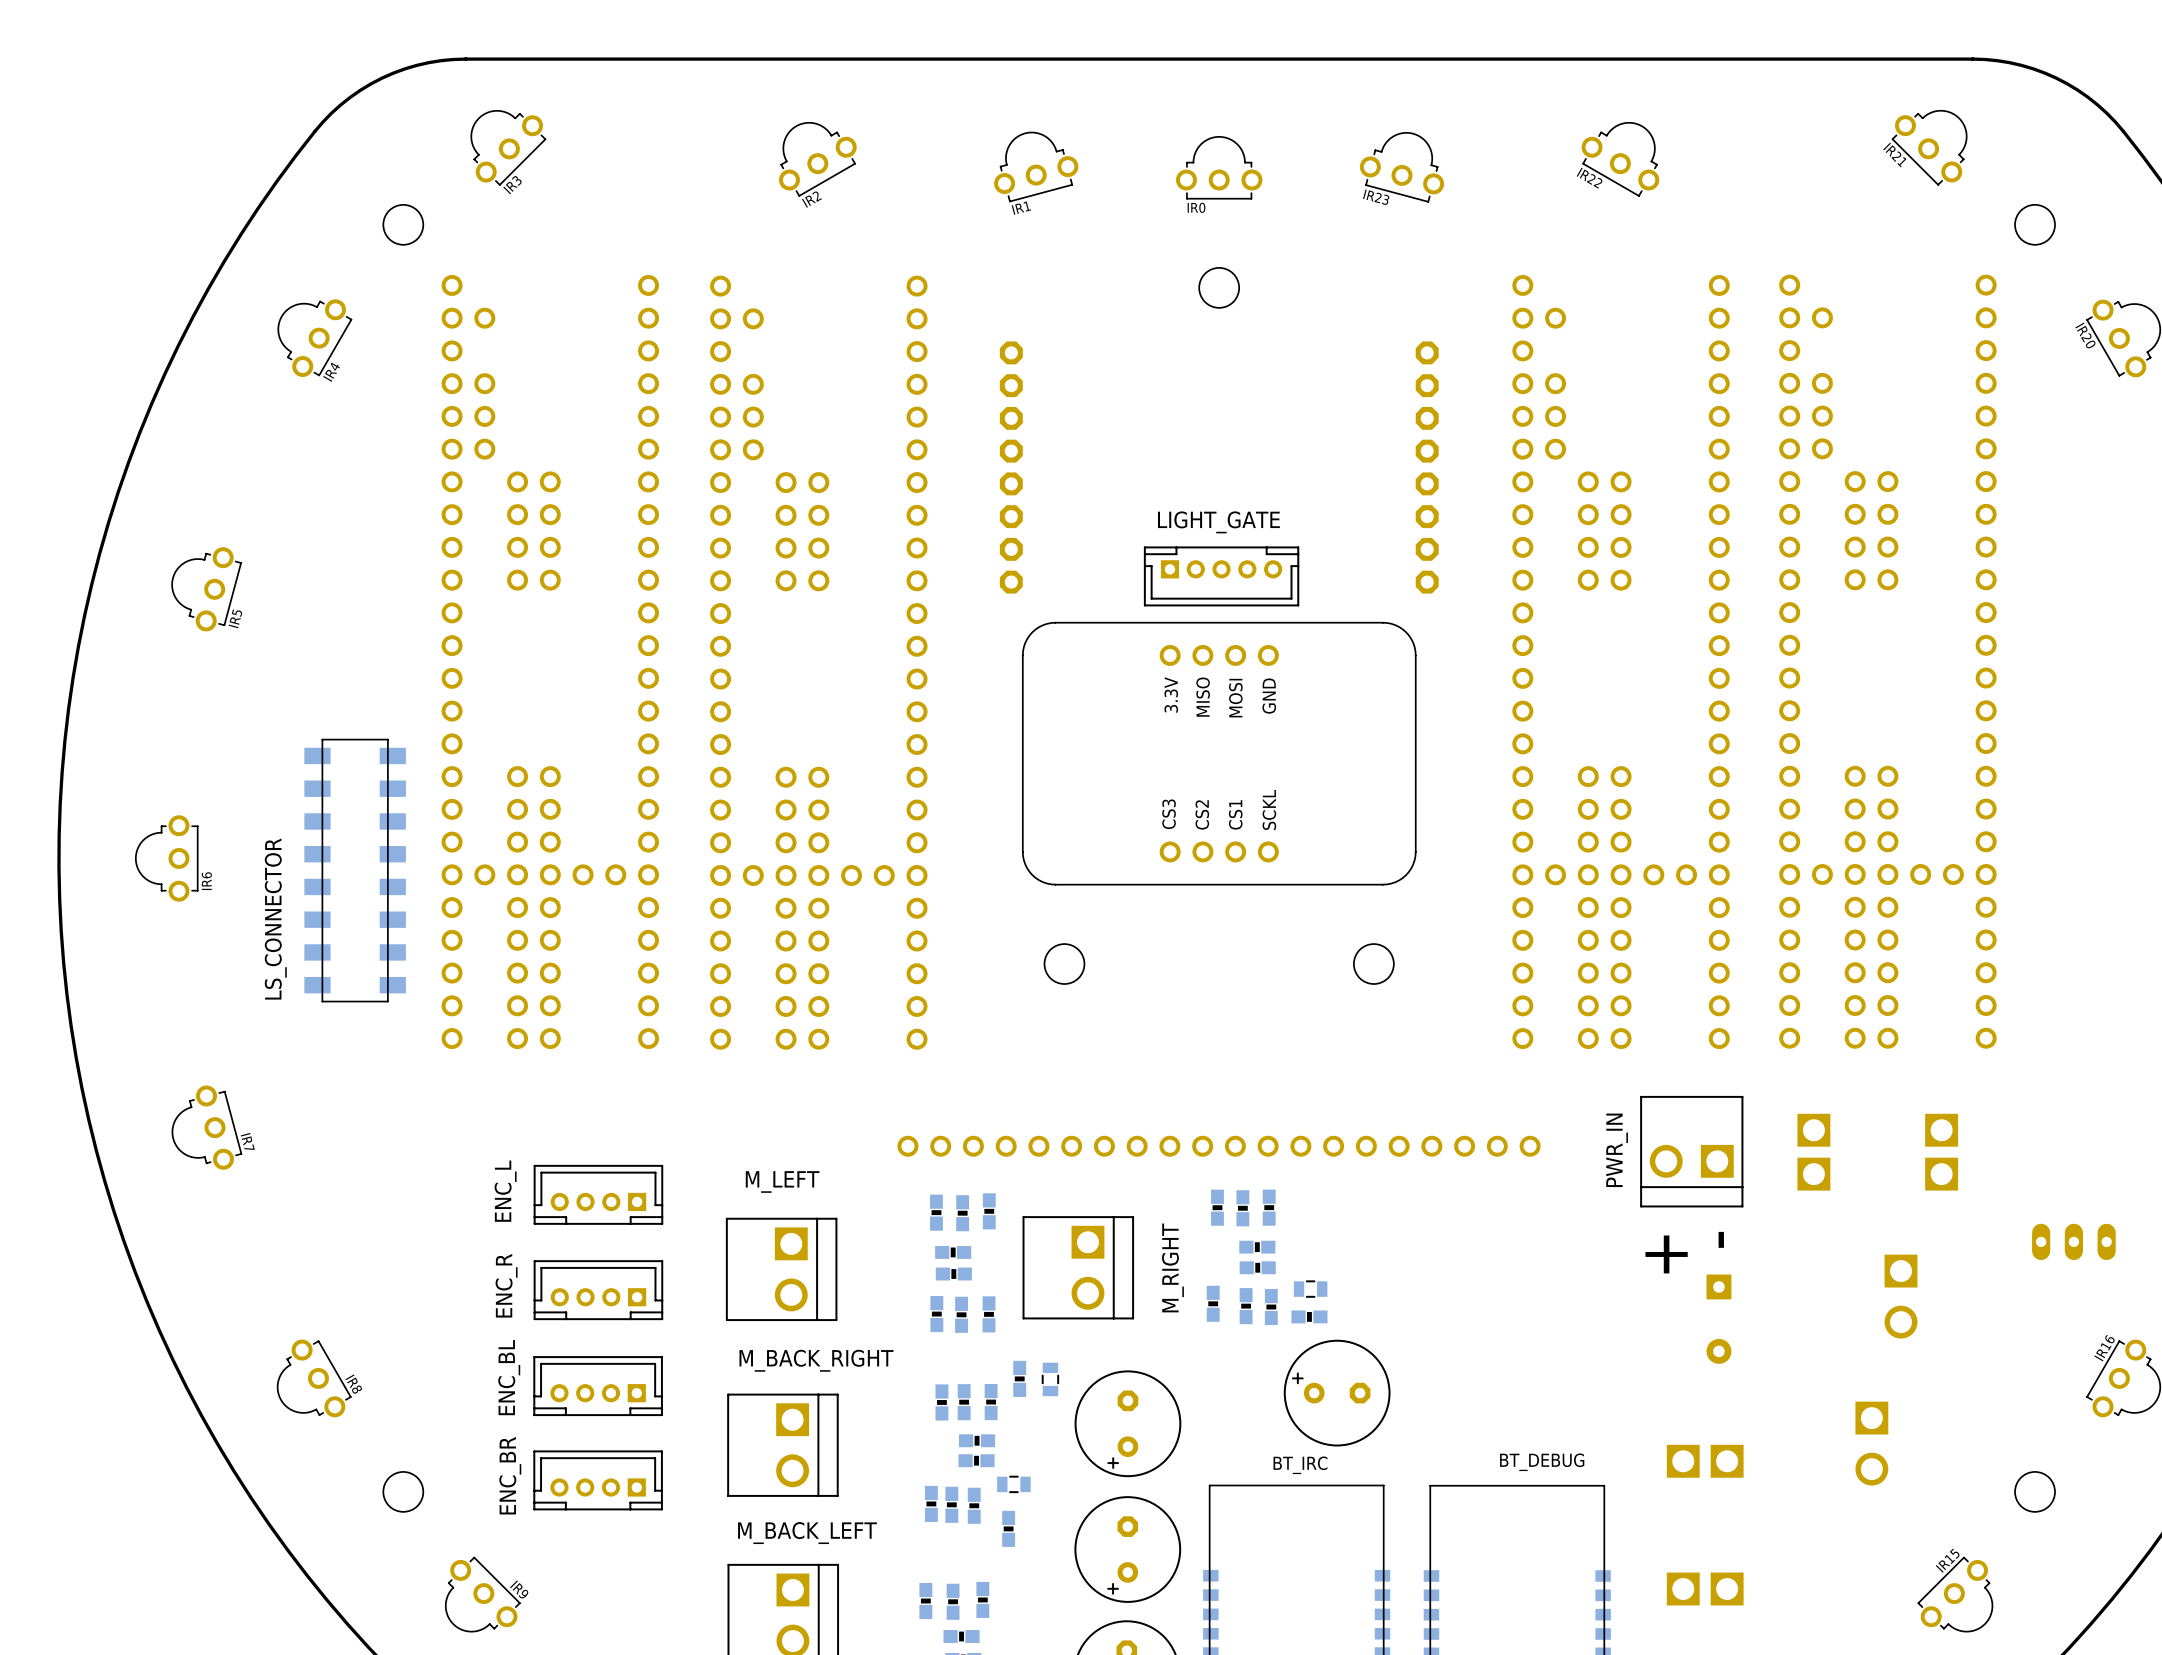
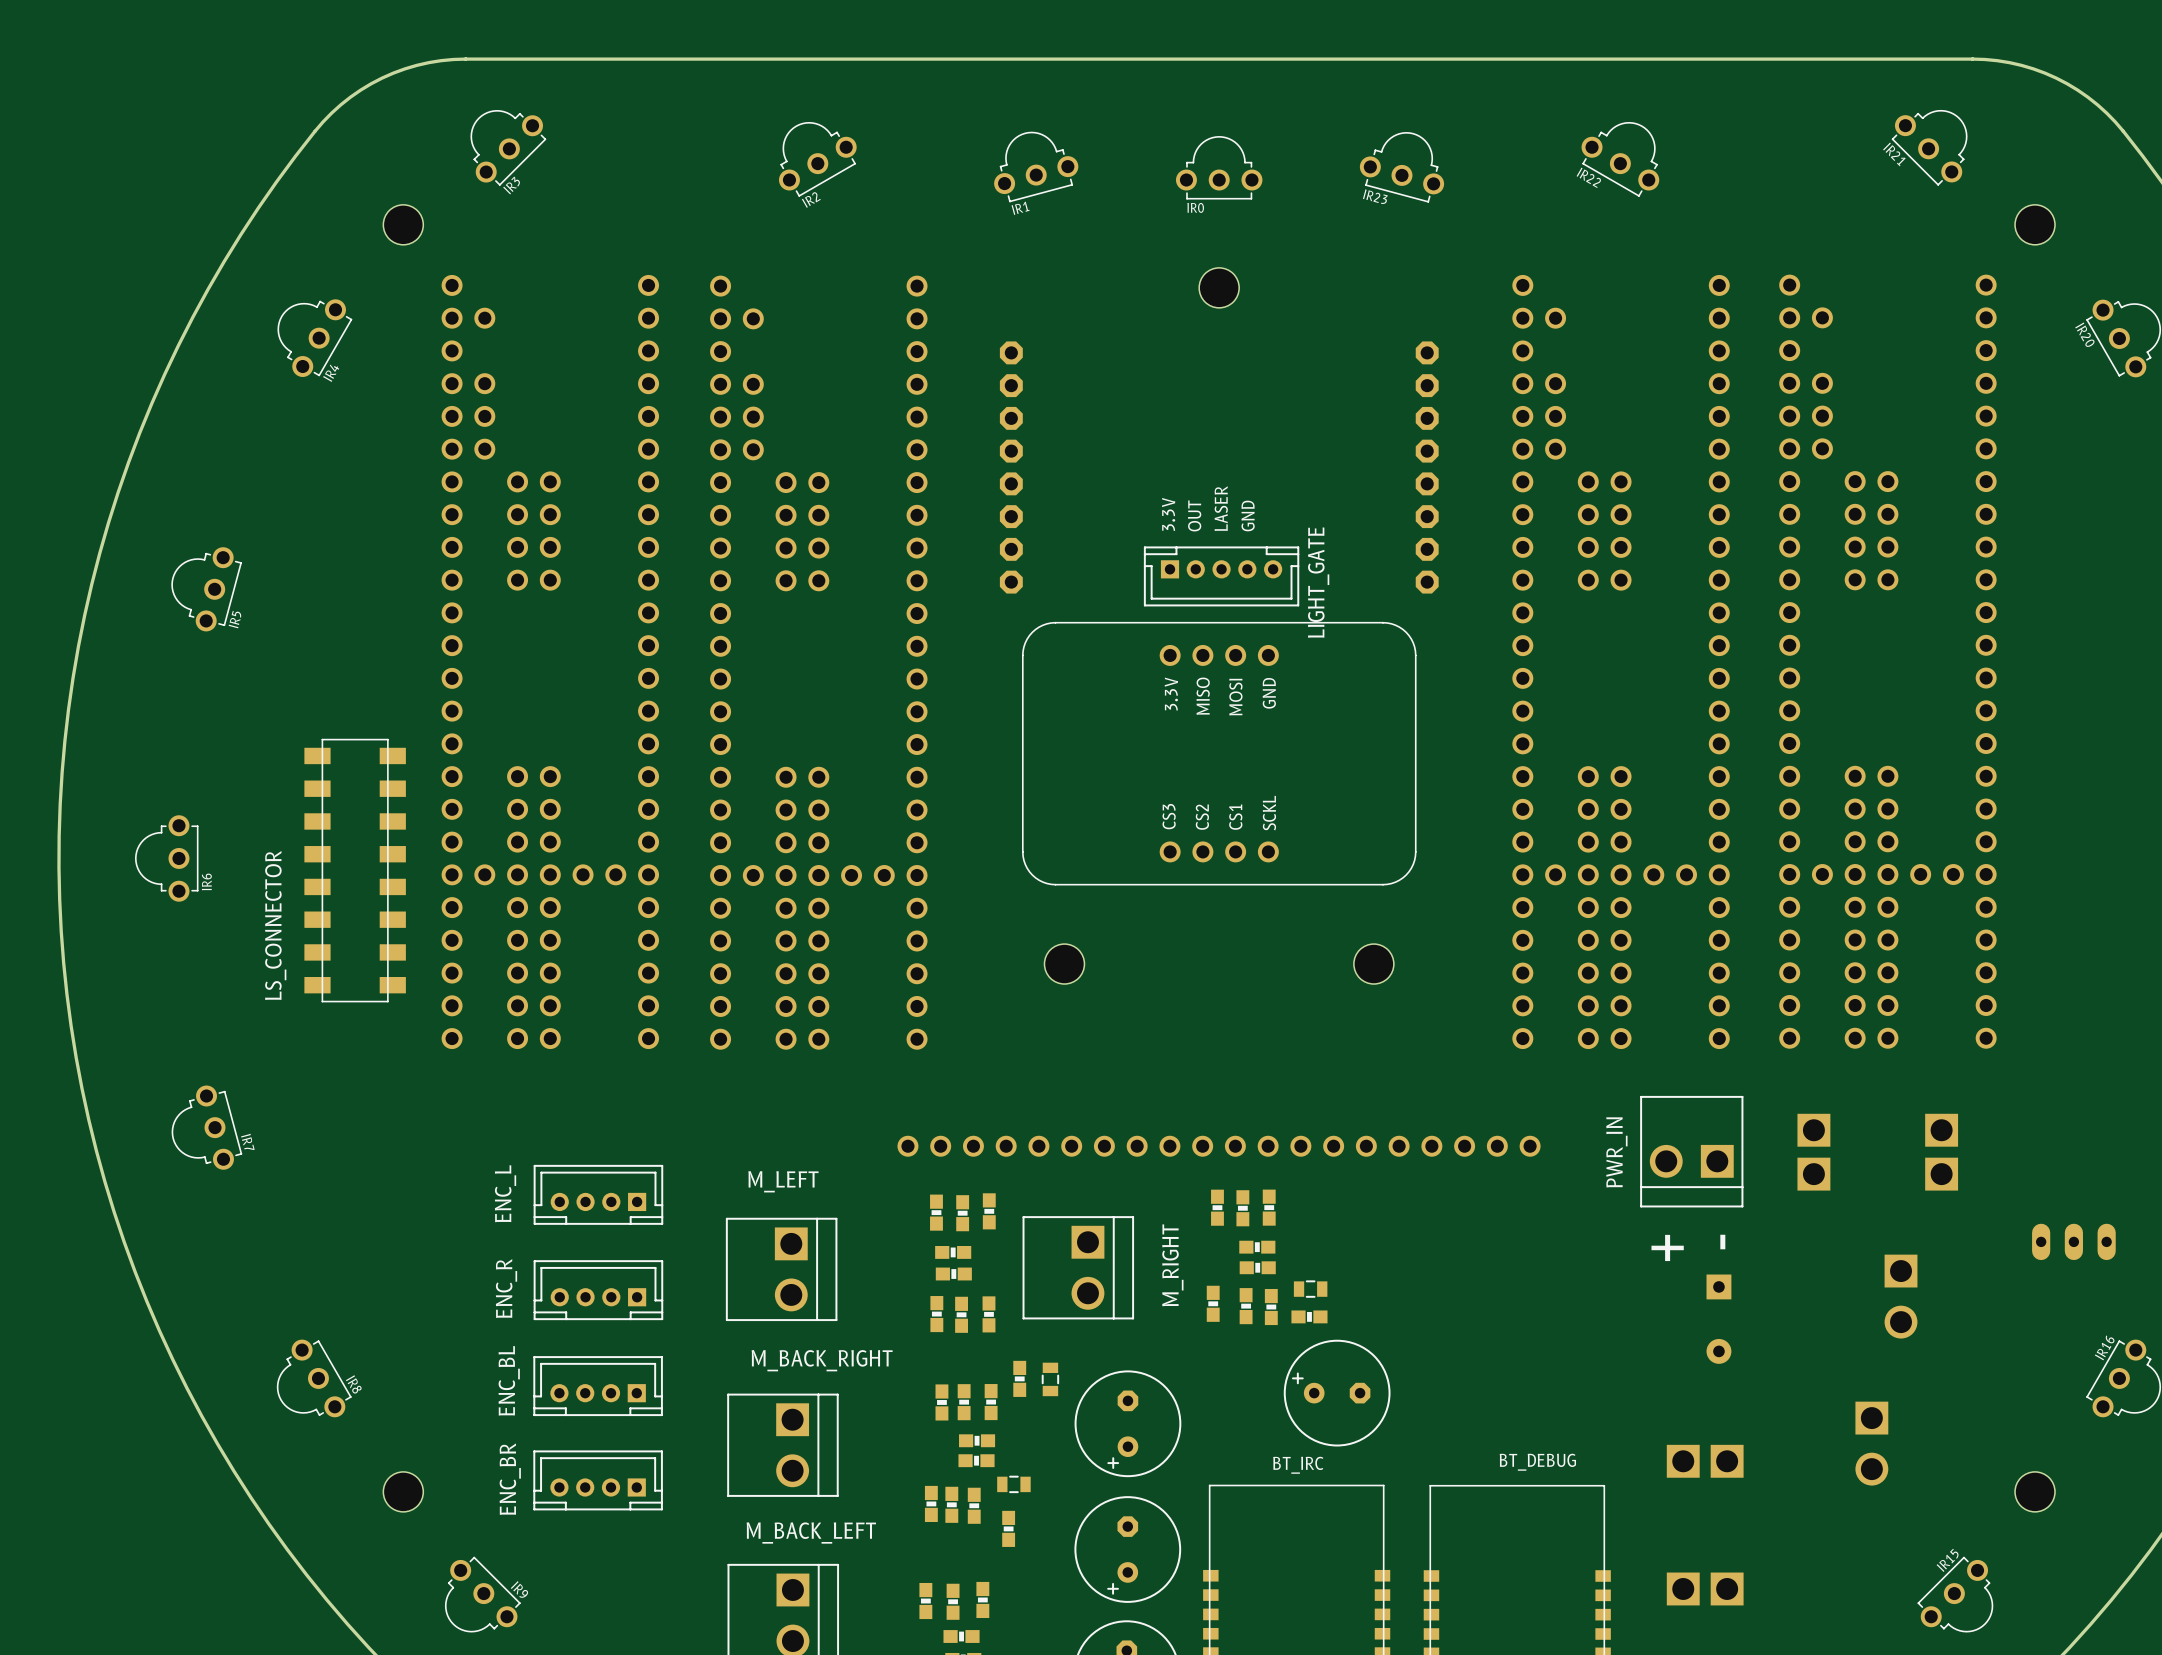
text: none -> LASER (1221, 508)
text: none -> 3.3V (1168, 514)
text: none -> GND (1248, 516)
text: none -> OUT (1194, 515)
LIGHT_GATE name rotation: 0° (1218, 522) -> 90° counterclockwise (1318, 582)

